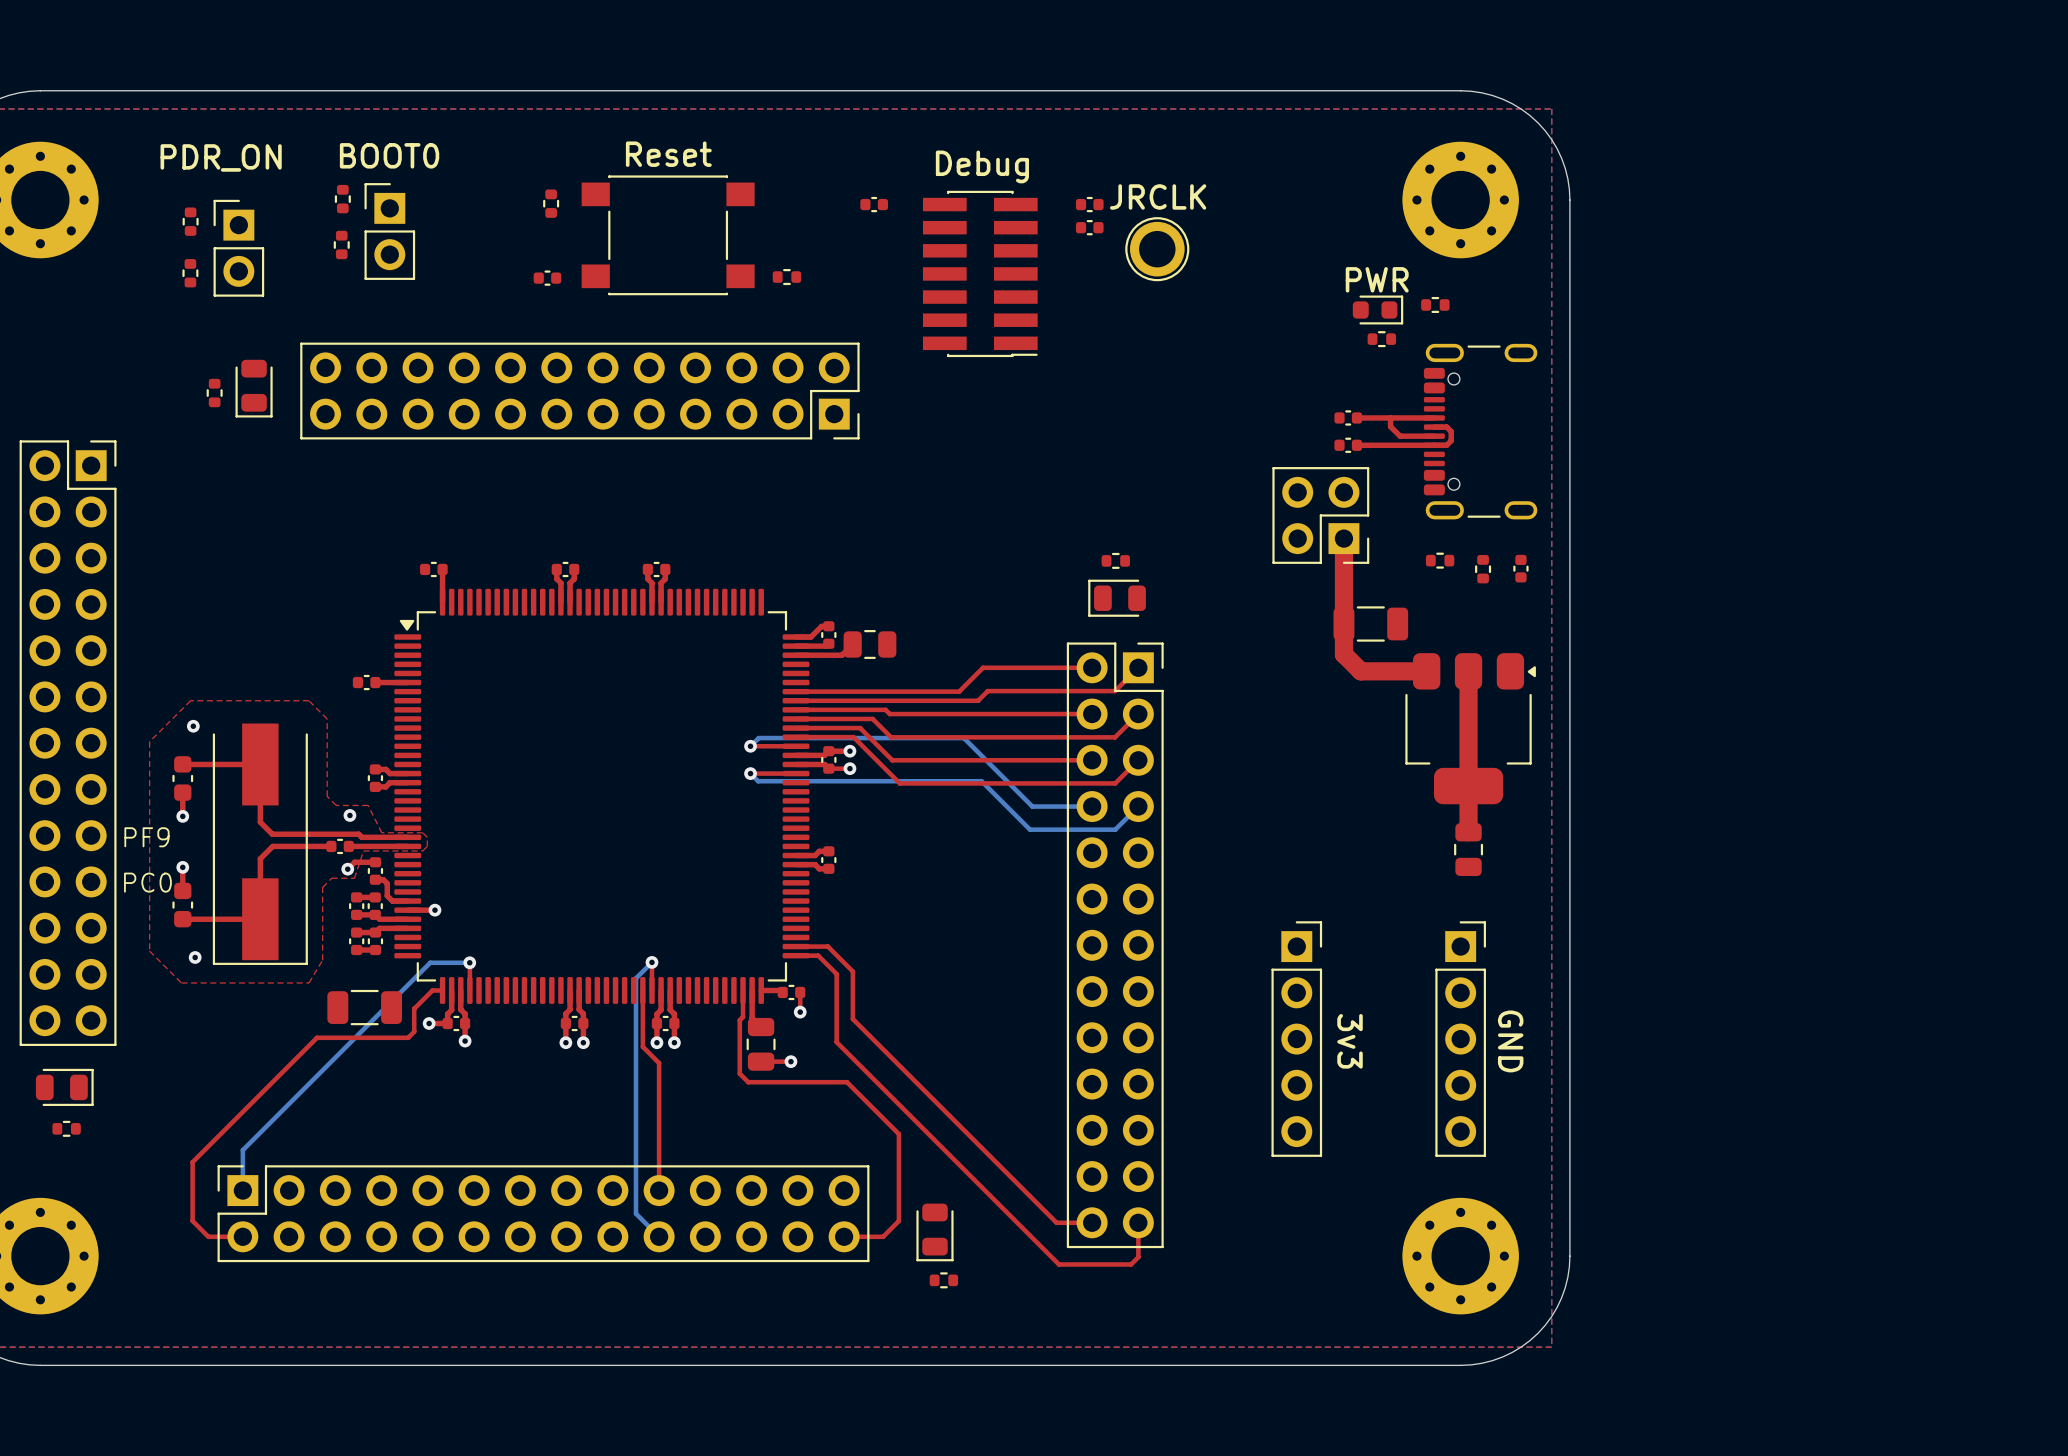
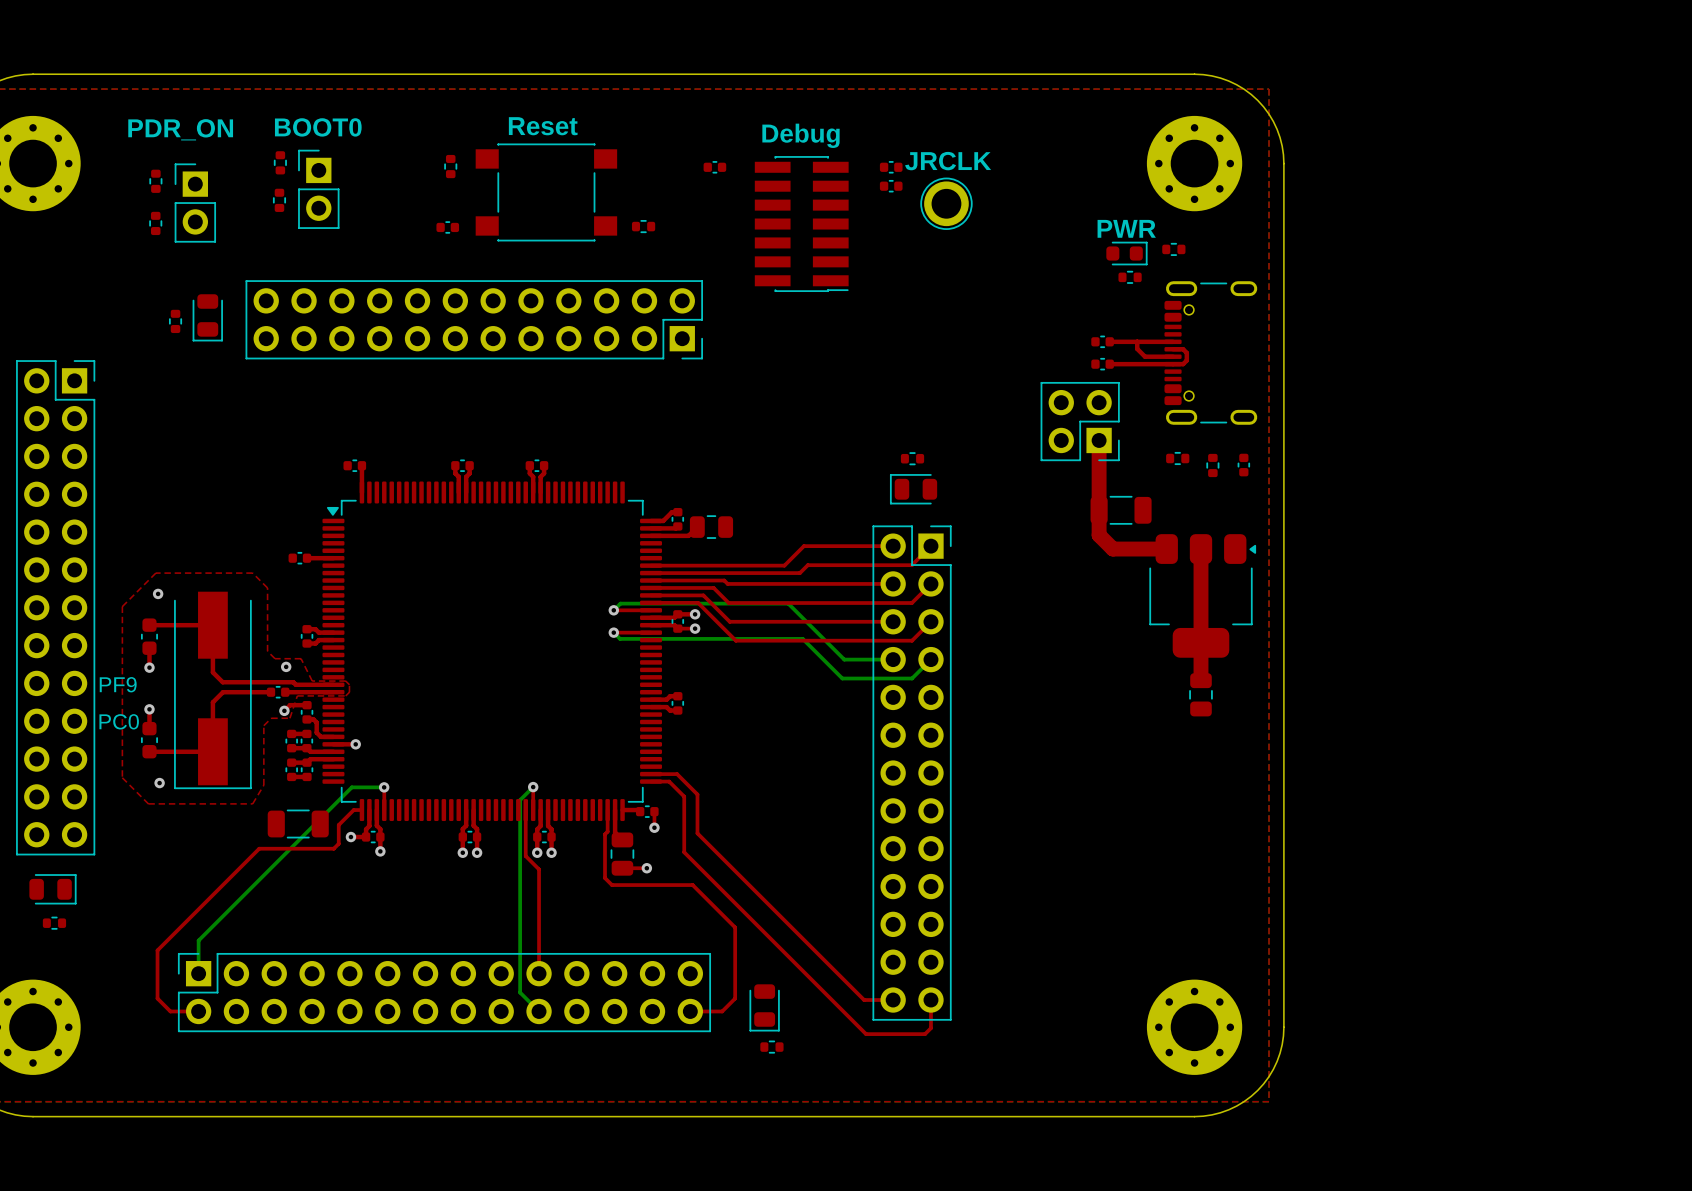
part: (1296, 1039) -> none
part: (1460, 1039) -> none
text: 3v3 (1350, 1041) -> none
text: GND (1510, 1041) -> none

